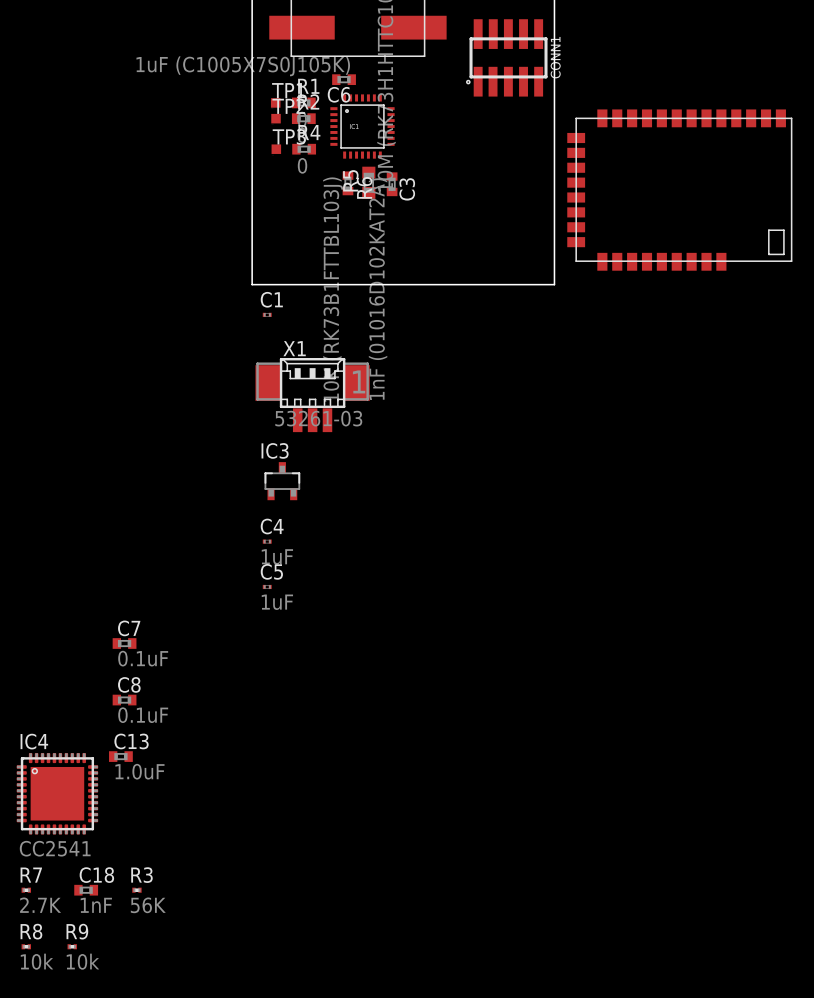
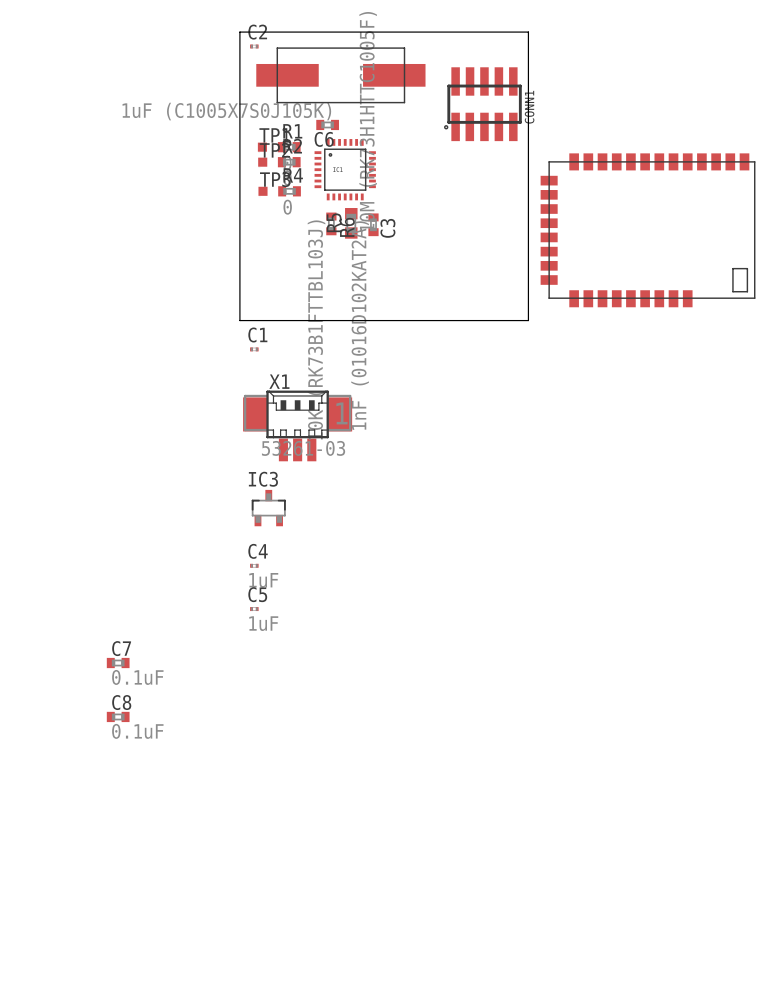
C13: 1.0uF (120, 756) -> none
IC4: CC2541 (57, 793) -> none
R7: 2.7K (26, 890) -> none
C18: 1nF (86, 890) -> none
R3: 56K (136, 890) -> none
R8: 10k (26, 946) -> none
R9: 10k (72, 946) -> none

